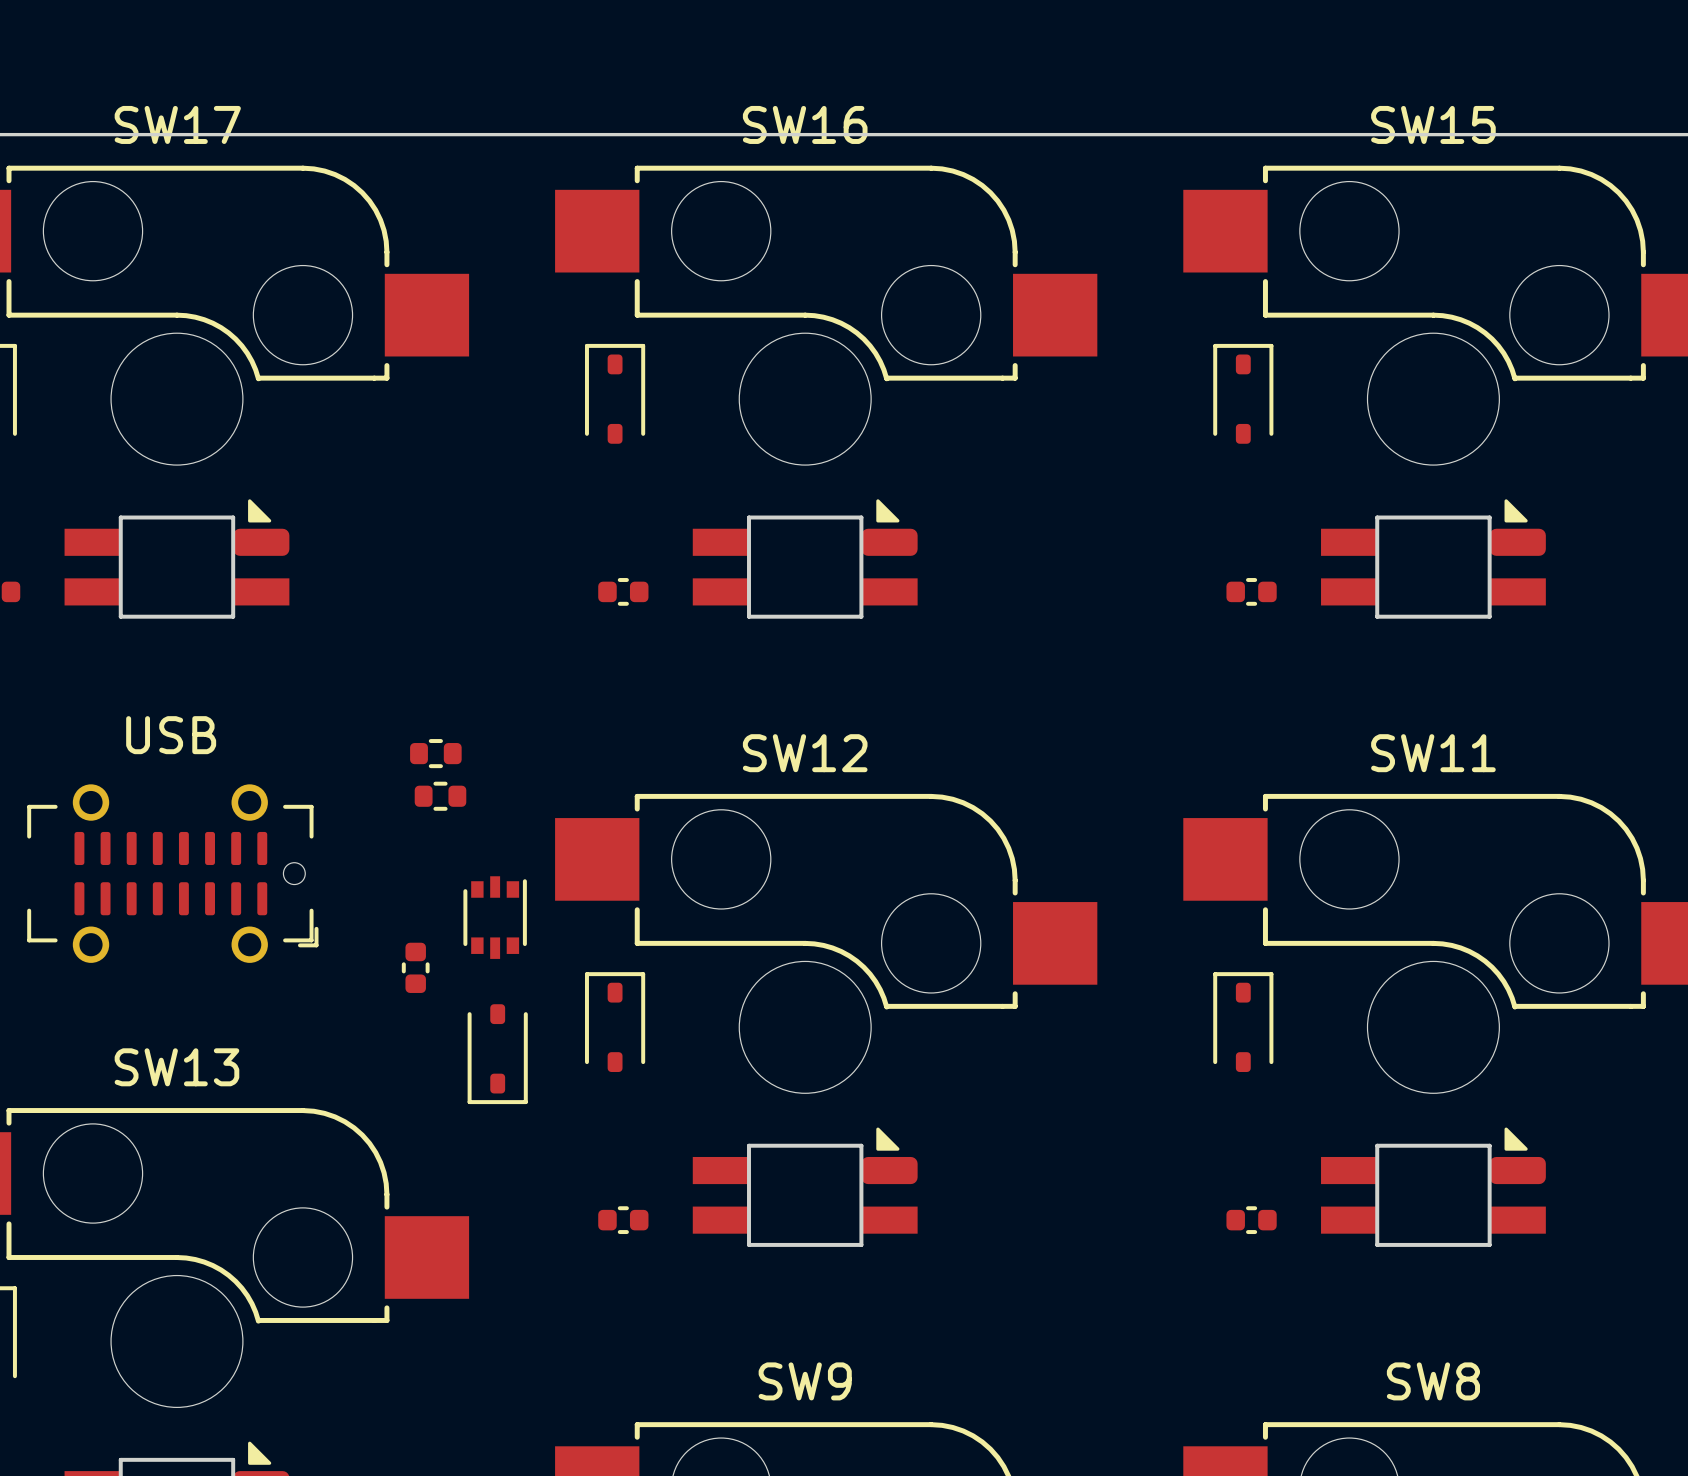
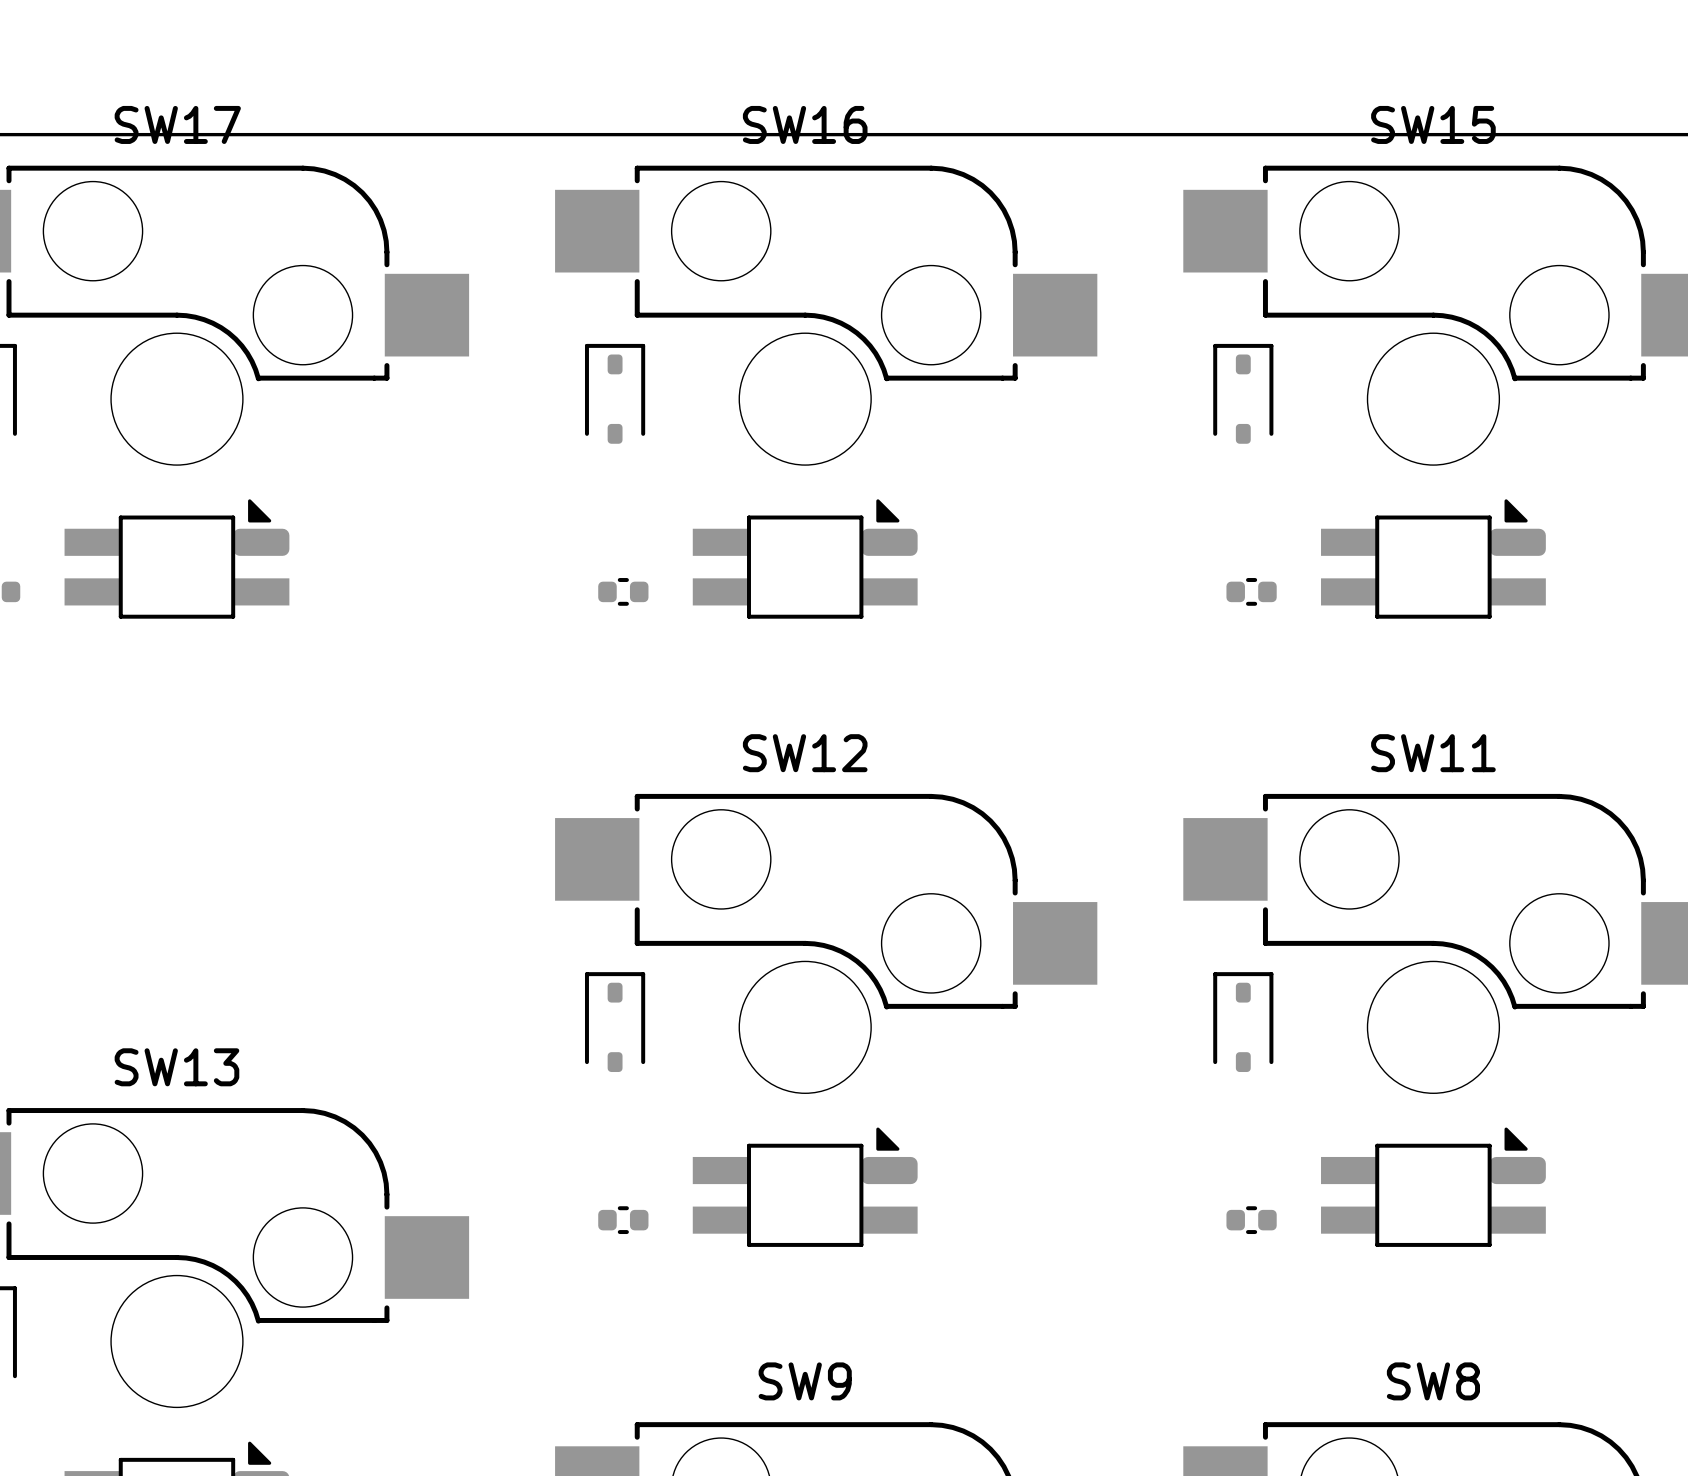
part: (435, 753) -> none
part: (440, 796) -> none
part: (172, 873) -> none
part: (495, 917) -> none
part: (415, 967) -> none
part: (497, 1054) -> none

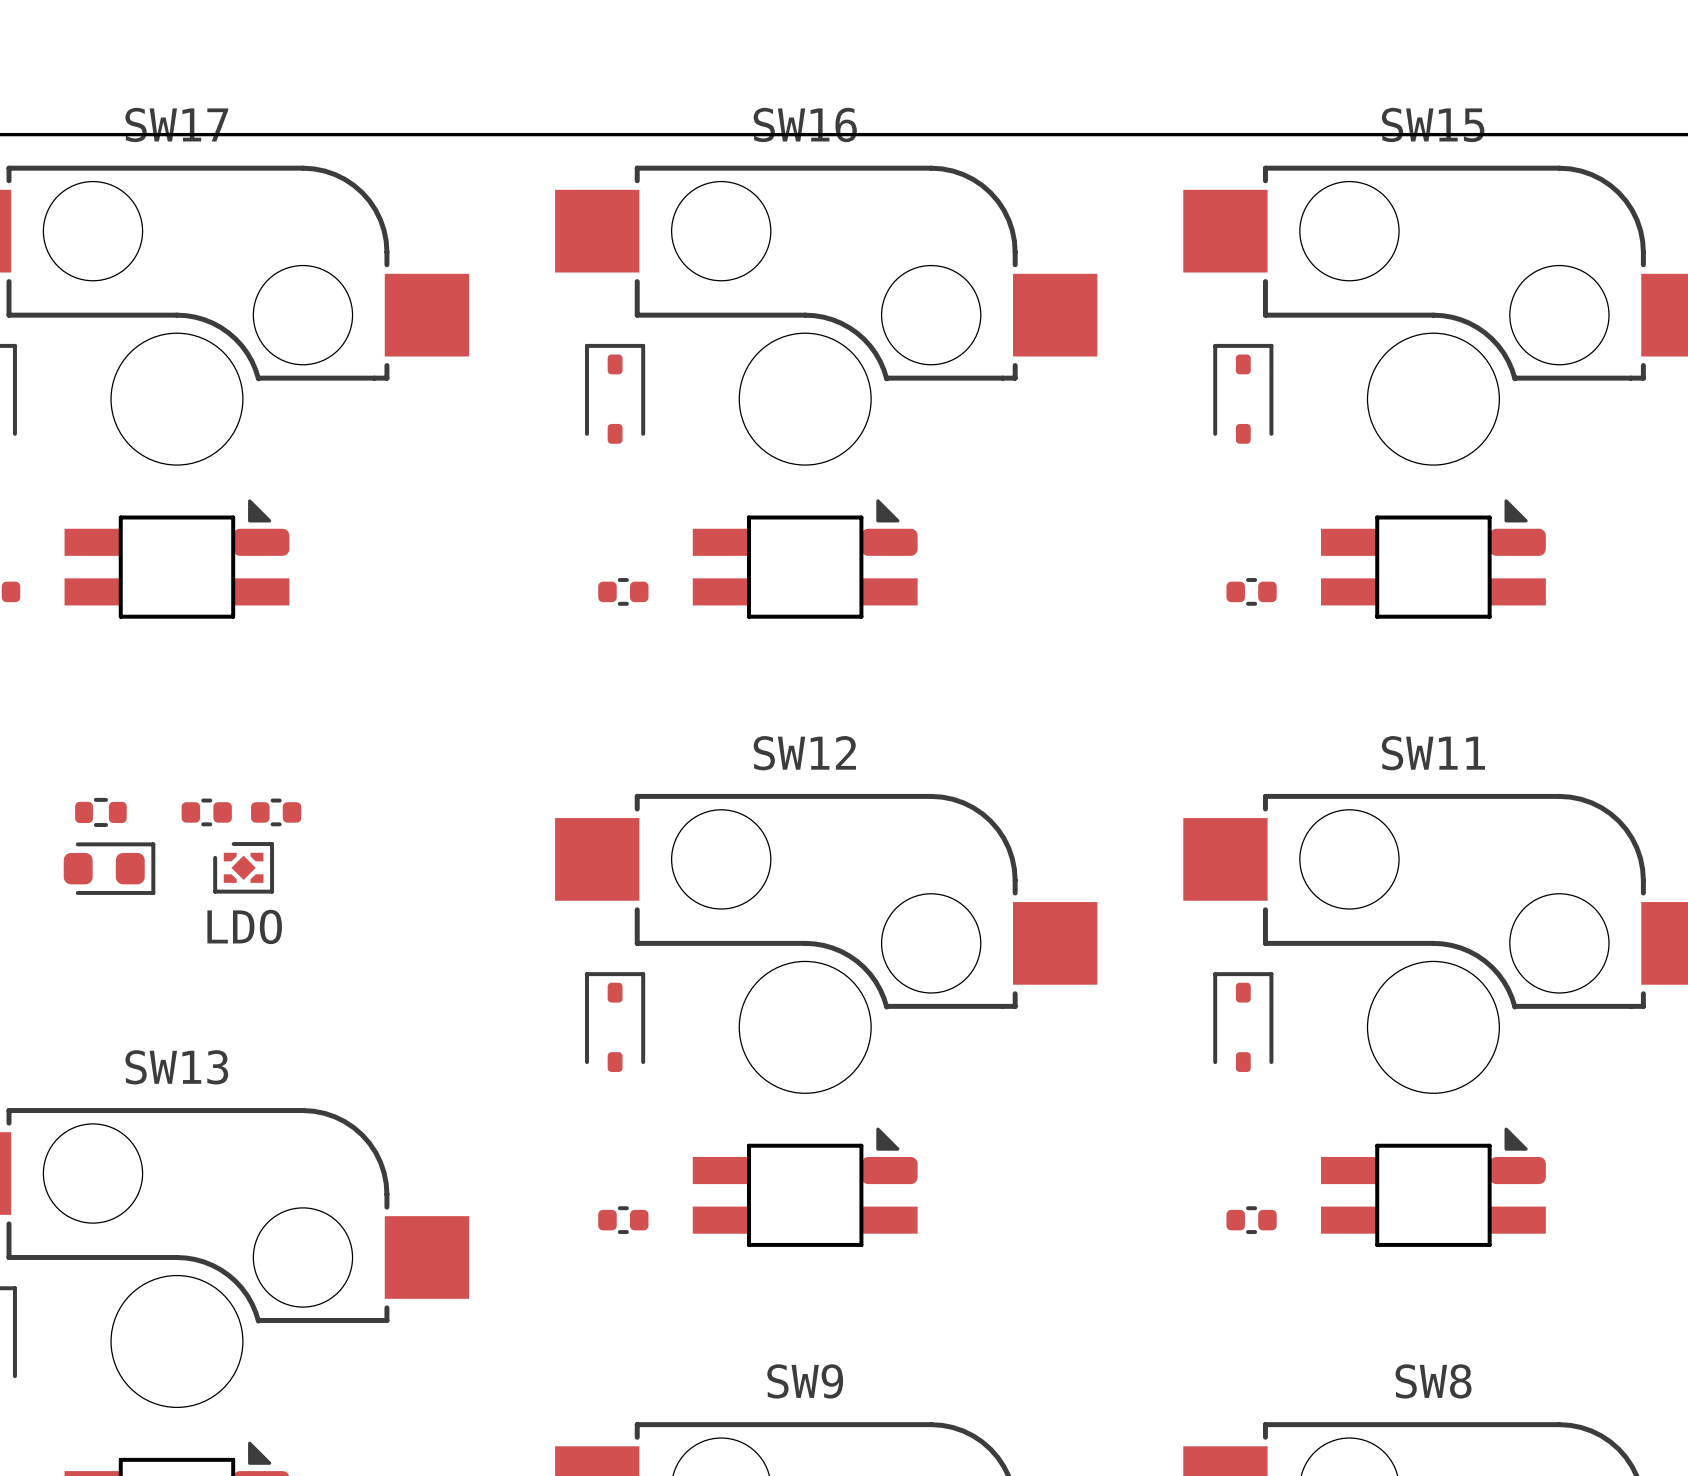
part: none -> (100, 812)
part: none -> (206, 812)
part: none -> (276, 812)
part: none -> (243, 867)
part: none -> (109, 868)

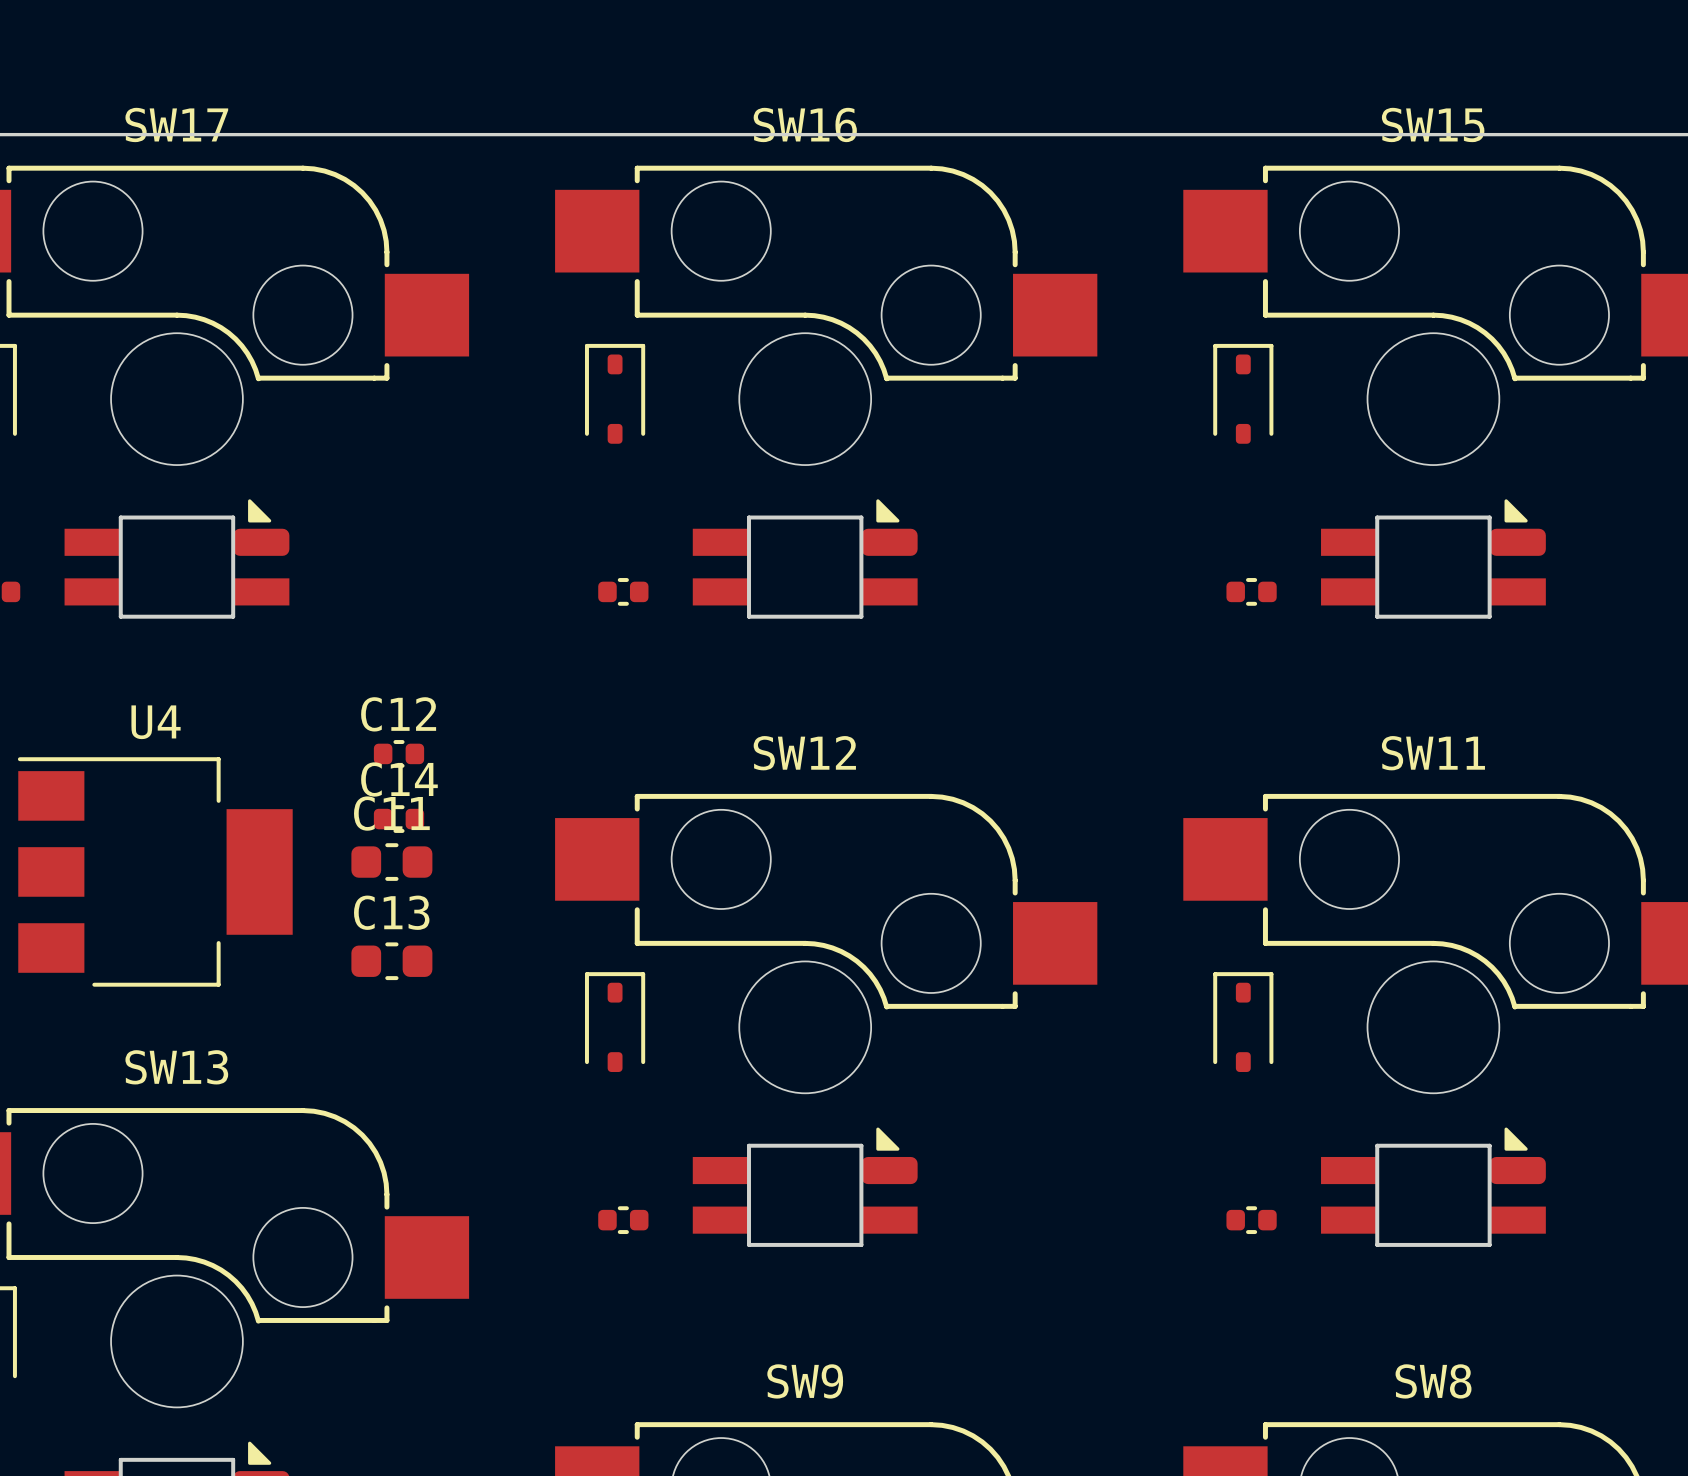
C12: none -> (399, 753)
part: (100, 812) -> none
part: (206, 812) -> none
part: (276, 812) -> none
C14: none -> (399, 819)
C11: none -> (391, 862)
part: (243, 867) -> none
part: (109, 868) -> none
U4: none -> (155, 871)
C13: none -> (391, 961)

